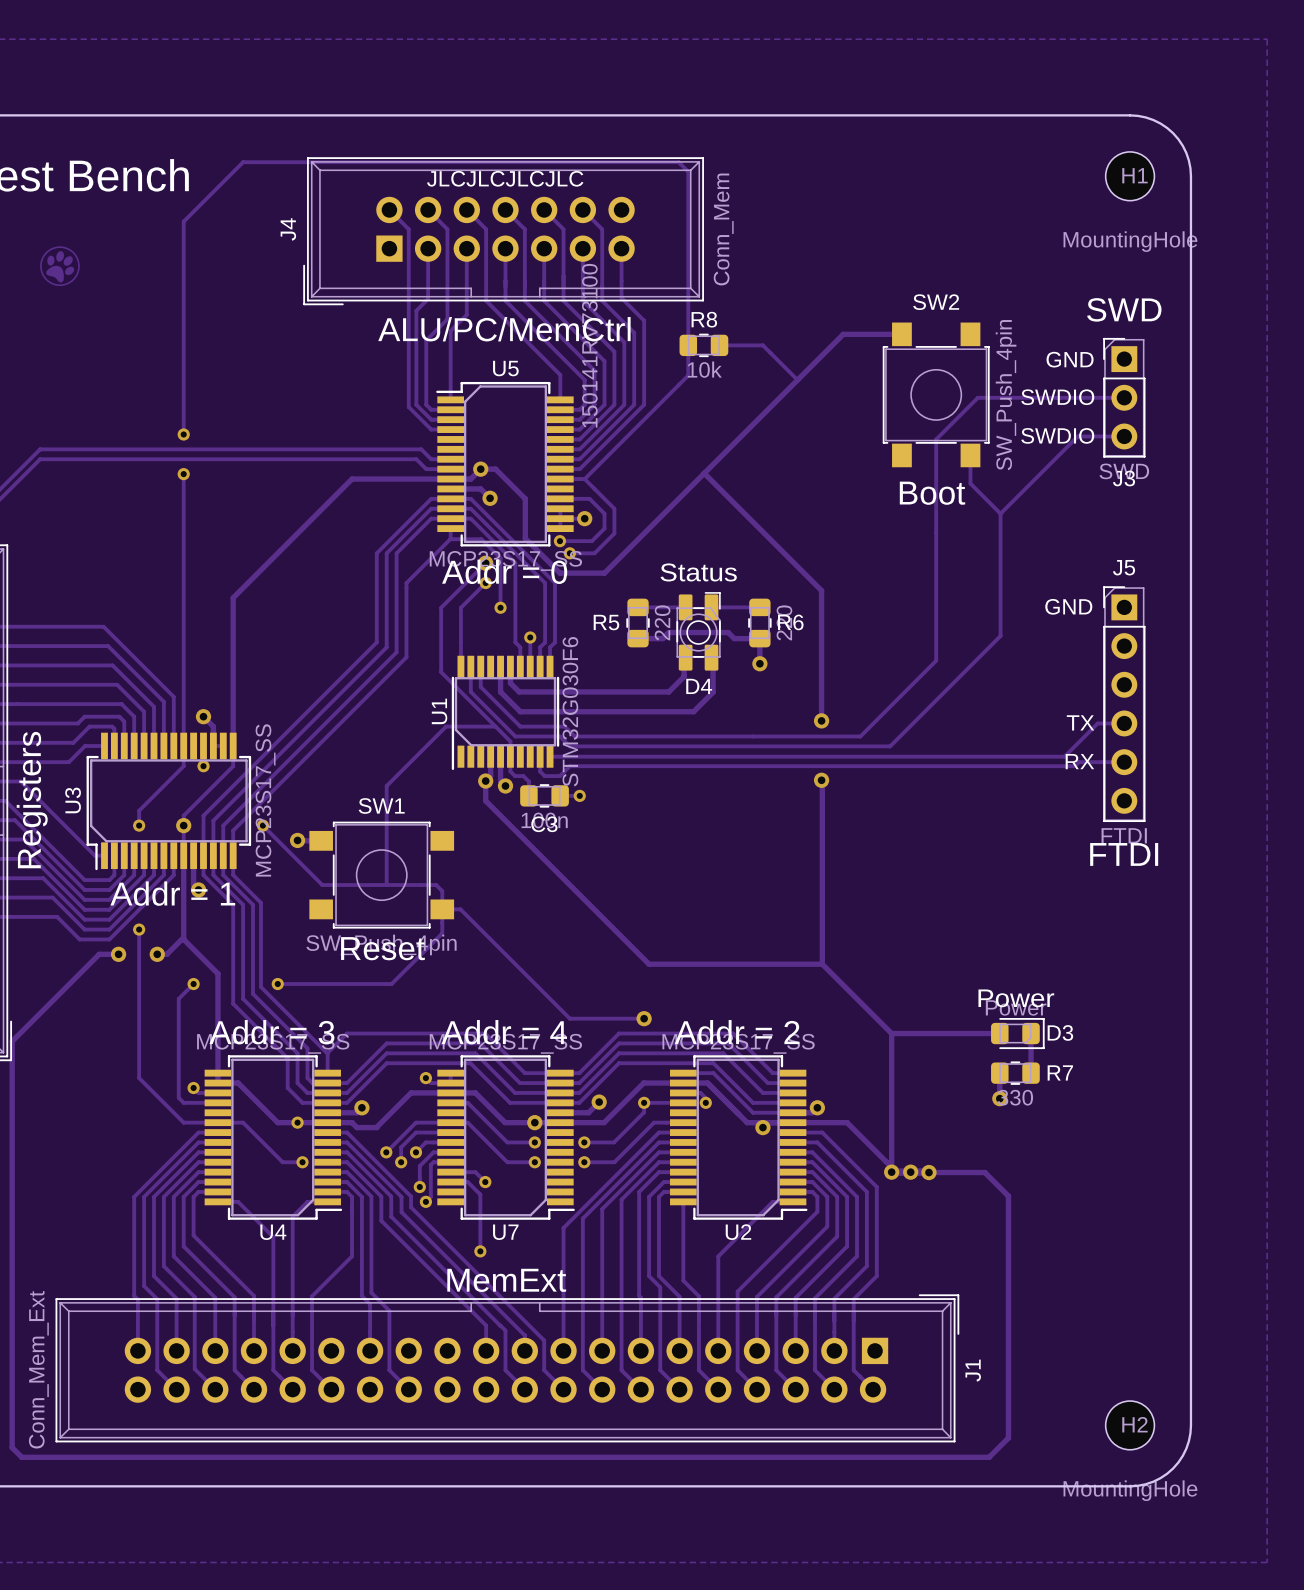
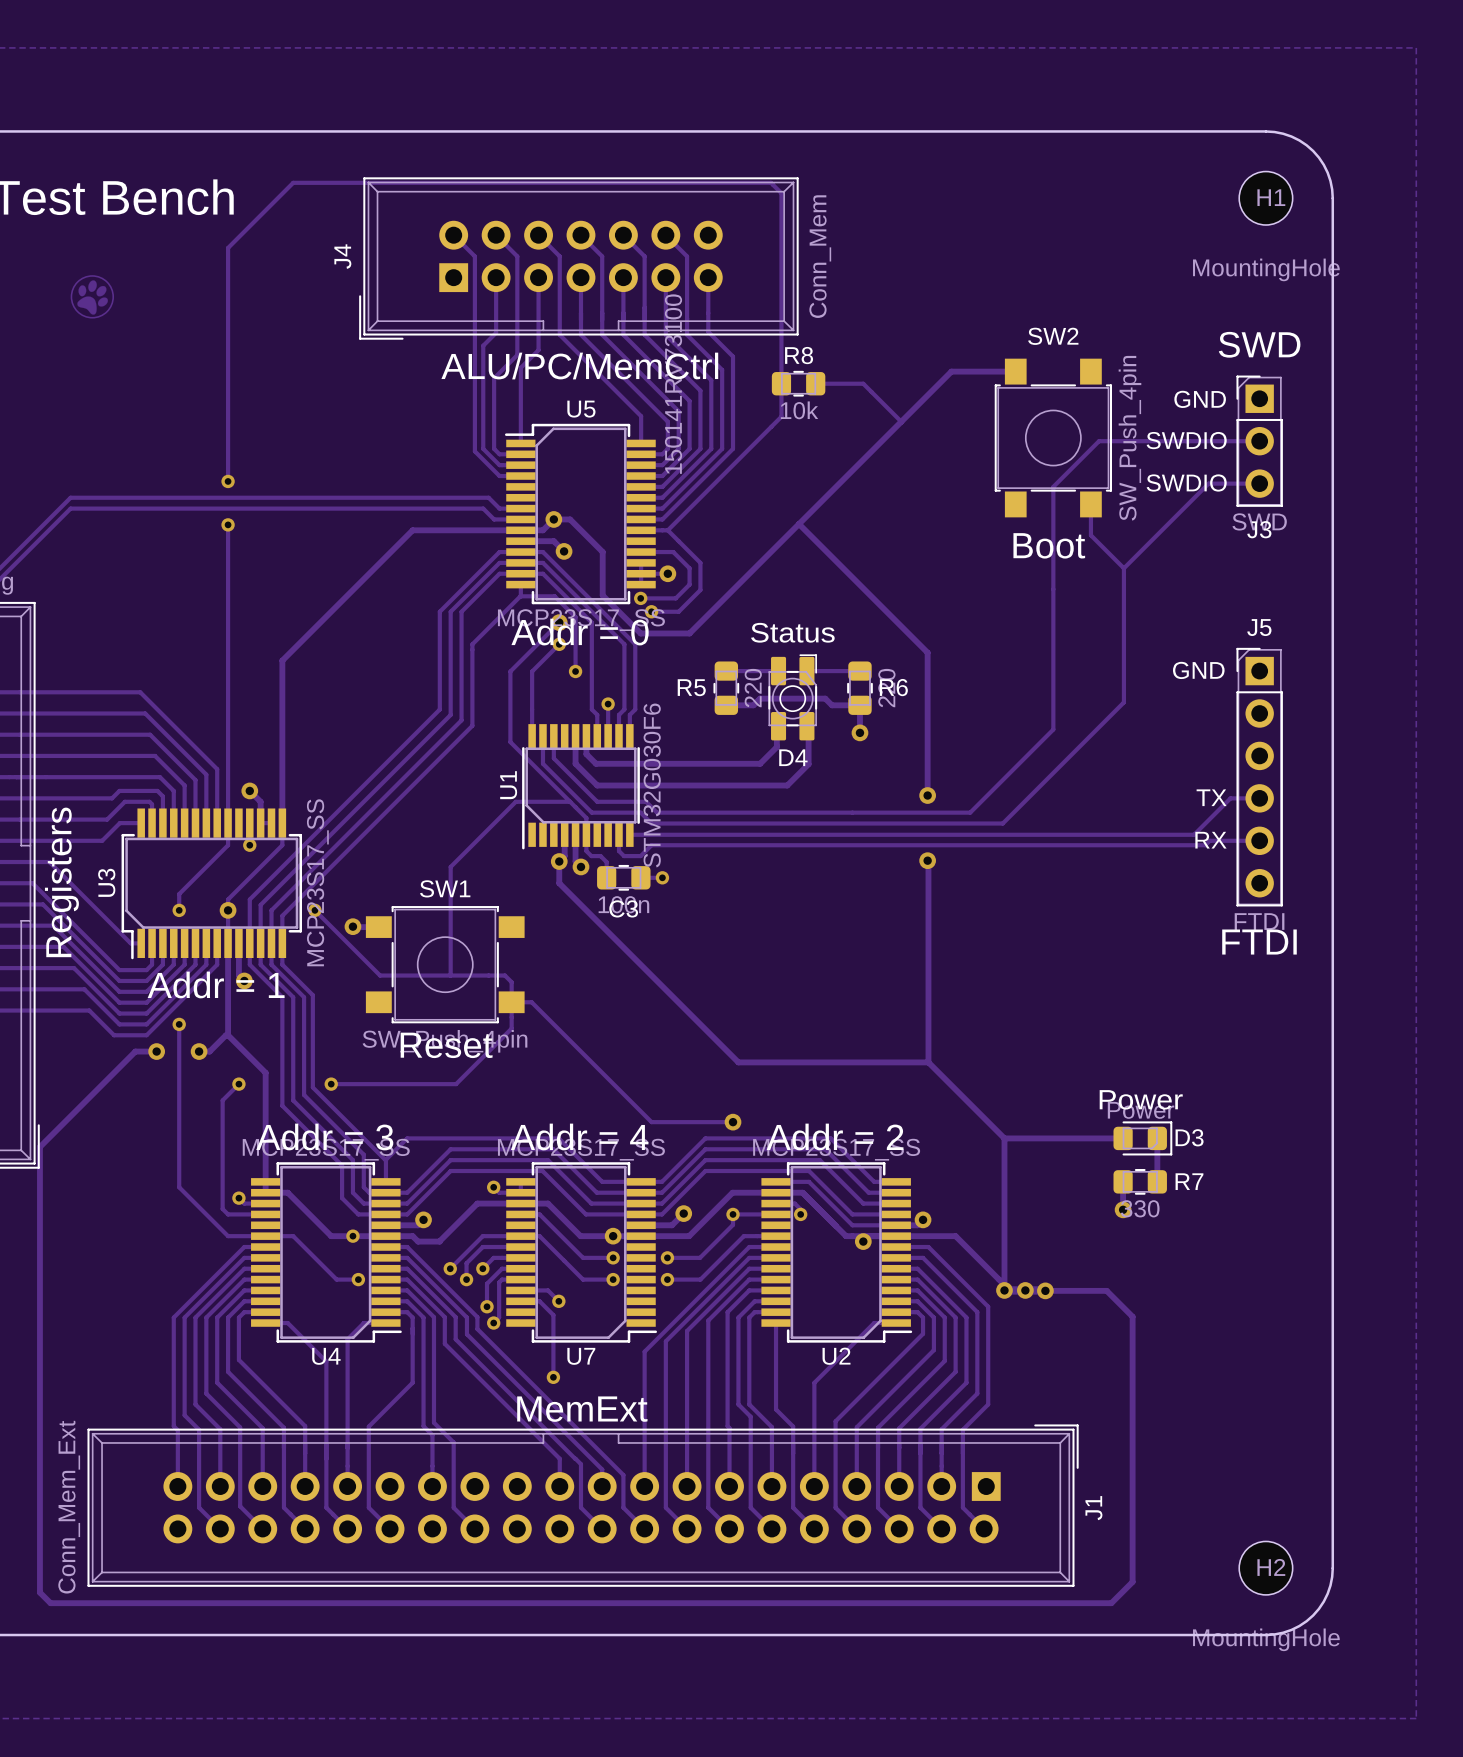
text: JLCJLCJLCJLC (505, 178) -> none

